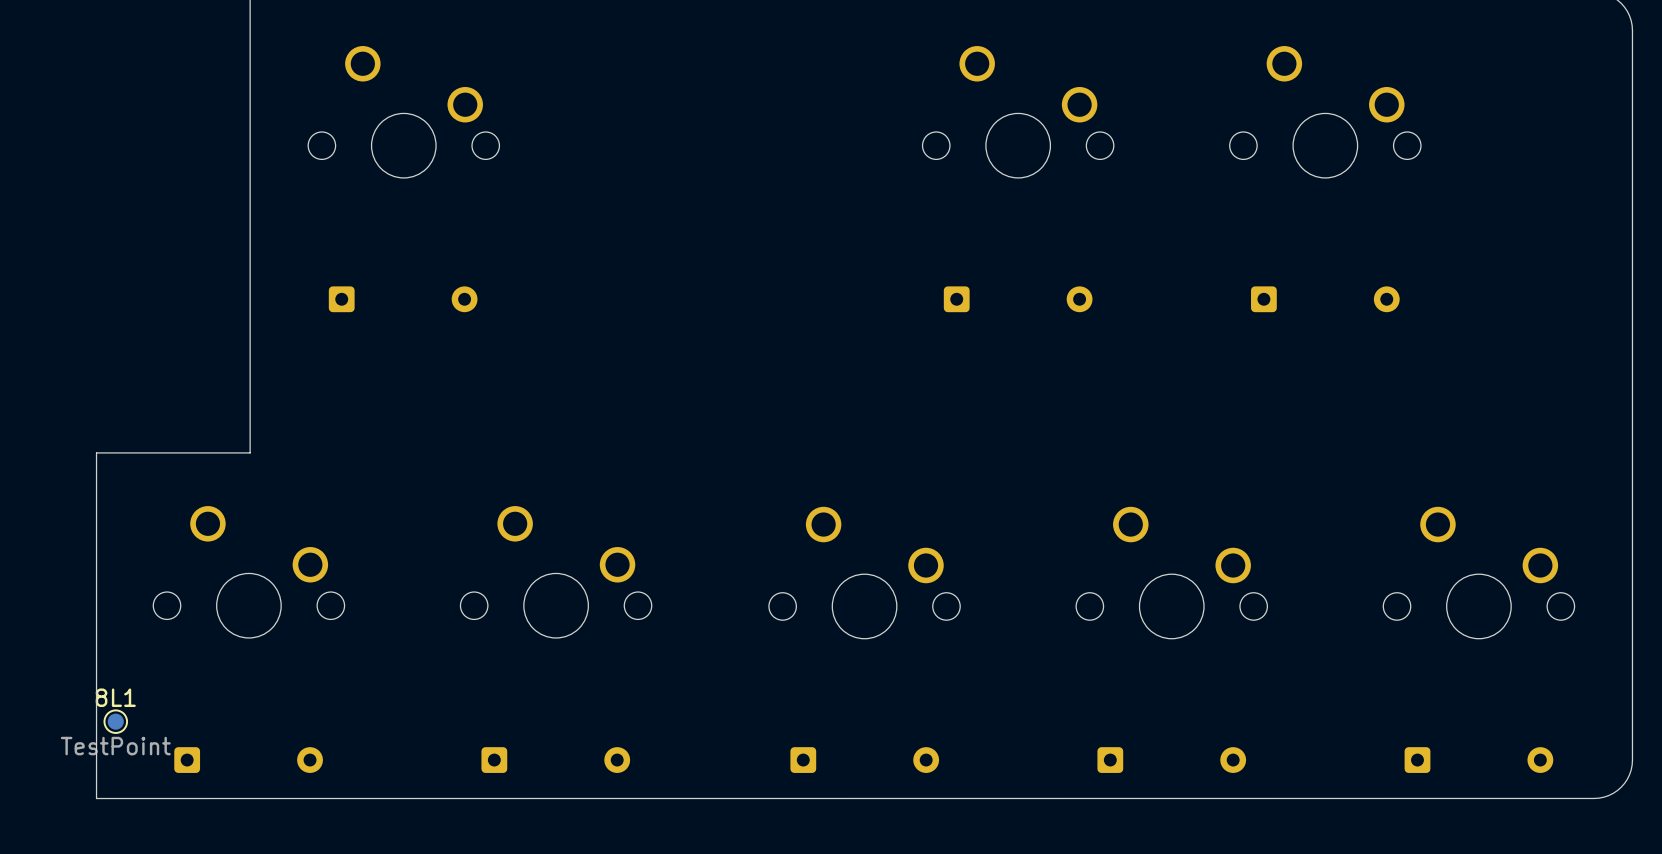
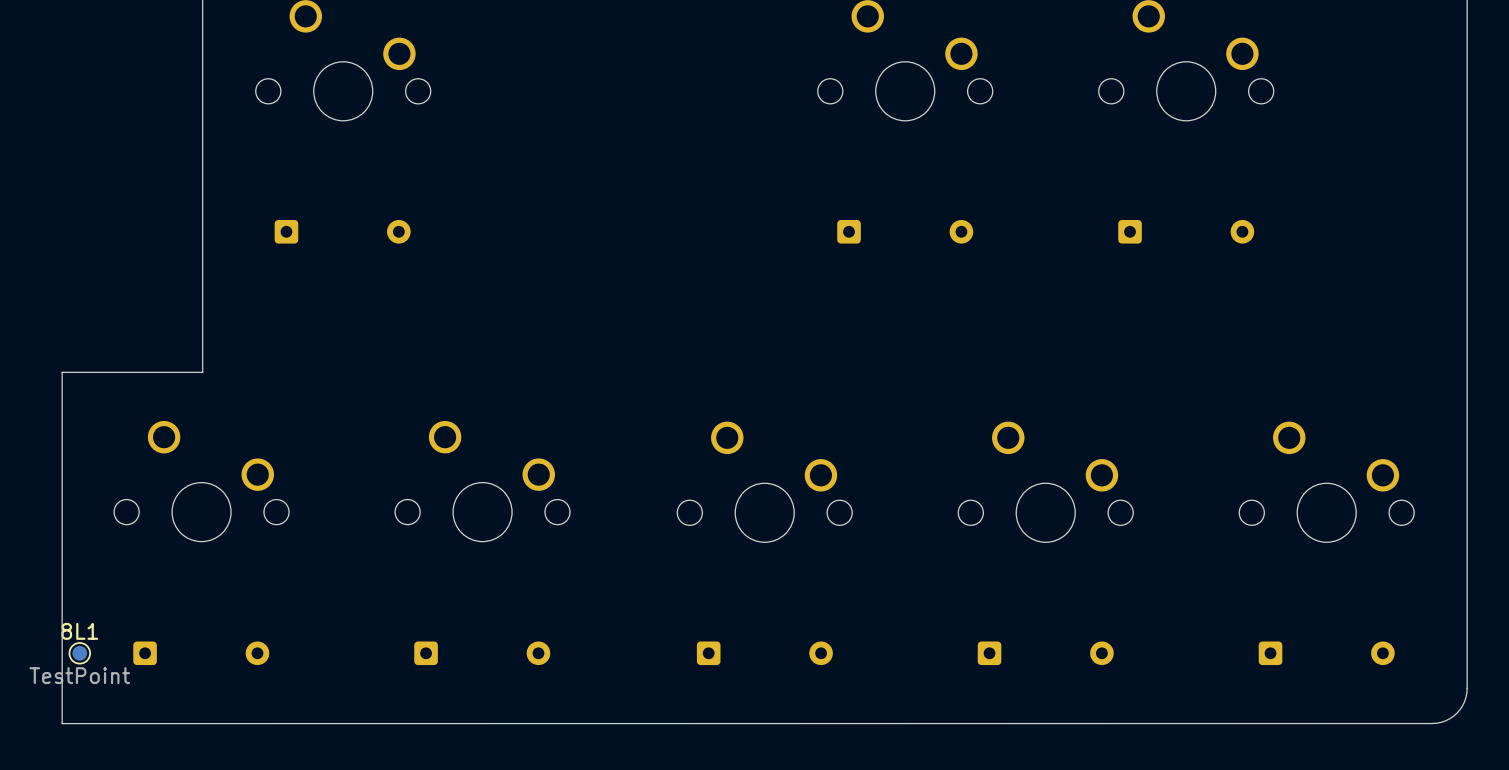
8L1 position: (115, 721) -> (79, 653)
board edge: (1632, 760) (1629, 774) (1621, 787) (1608, 795) (1594, 798) (96, 798) -> (1467, 653) (1466, 693) (1462, 705) (1449, 718) (1432, 723) (62, 723) (62, 688)

